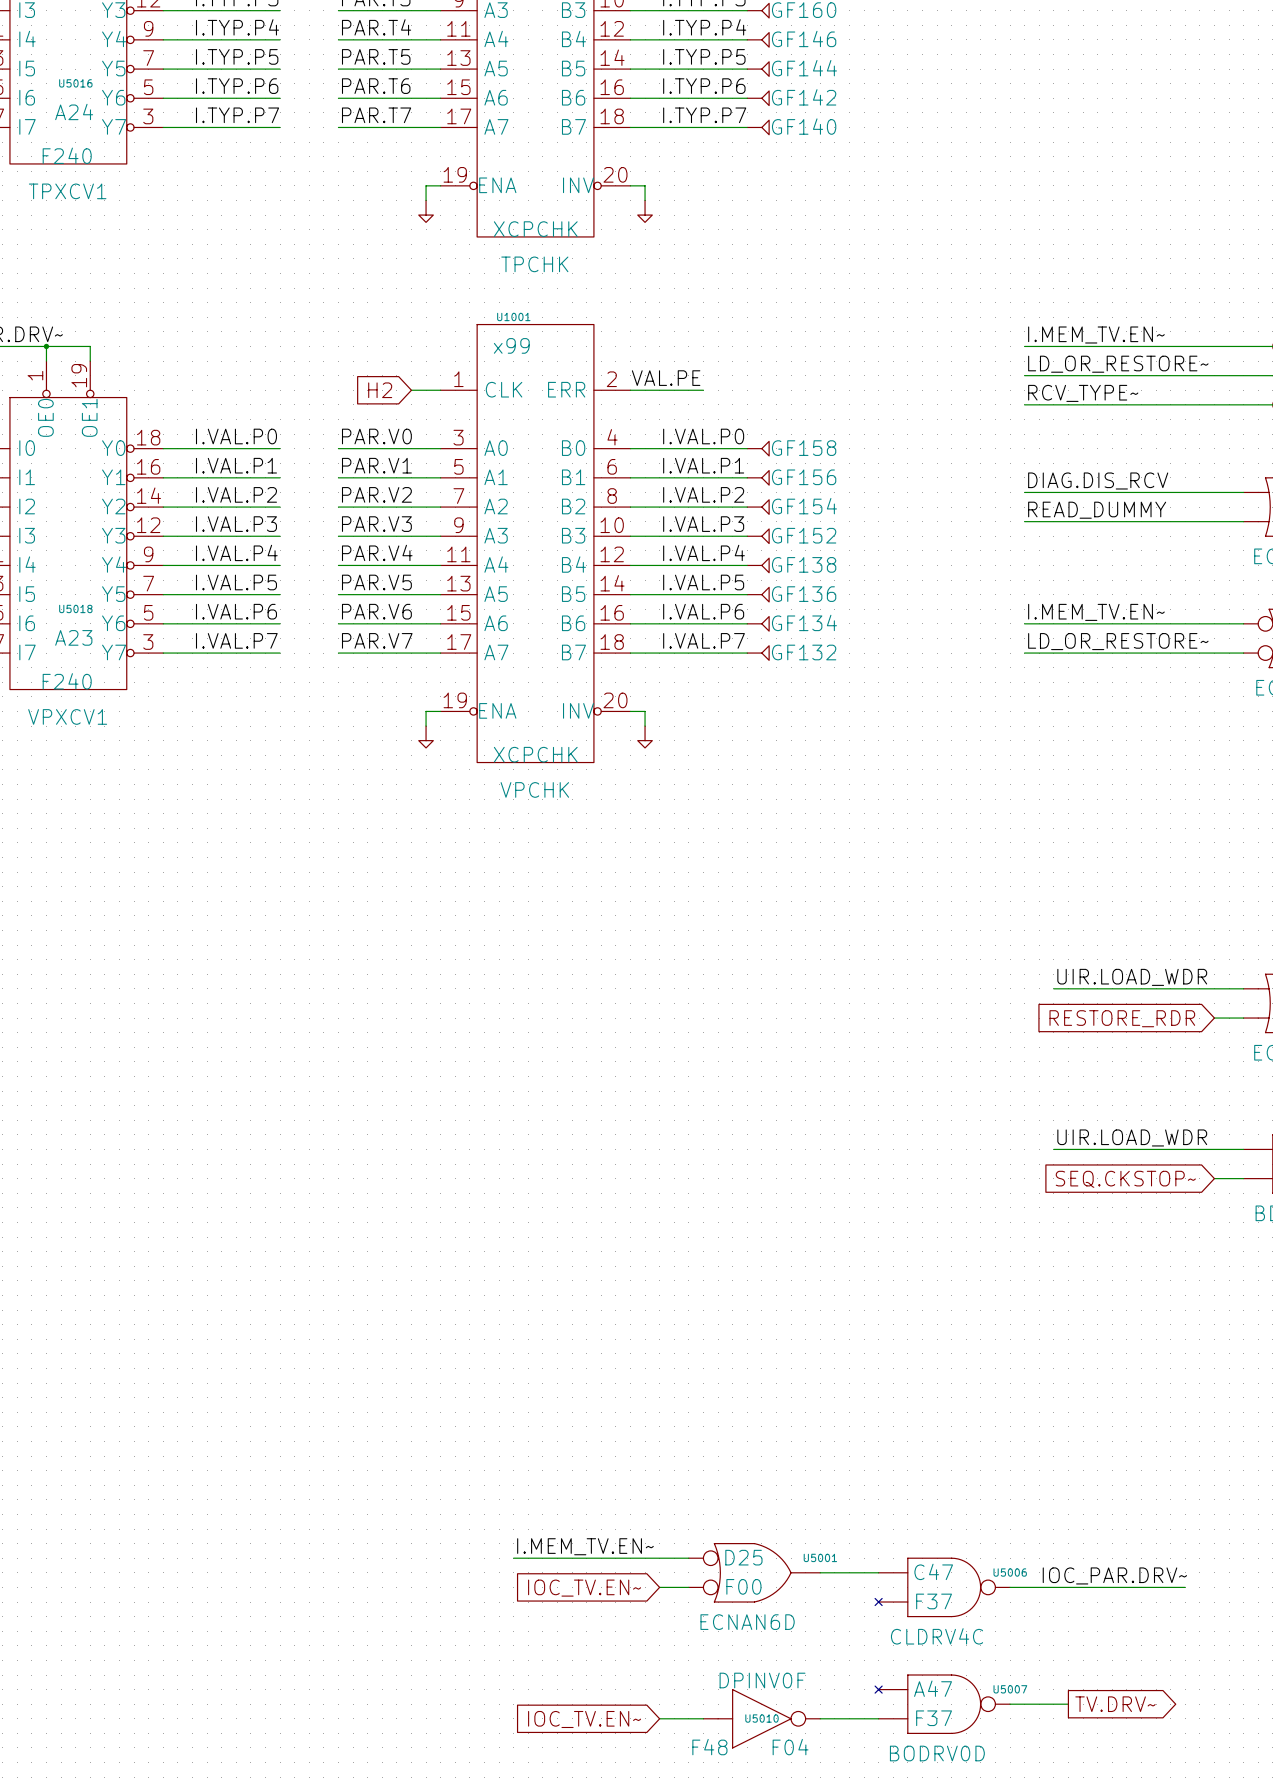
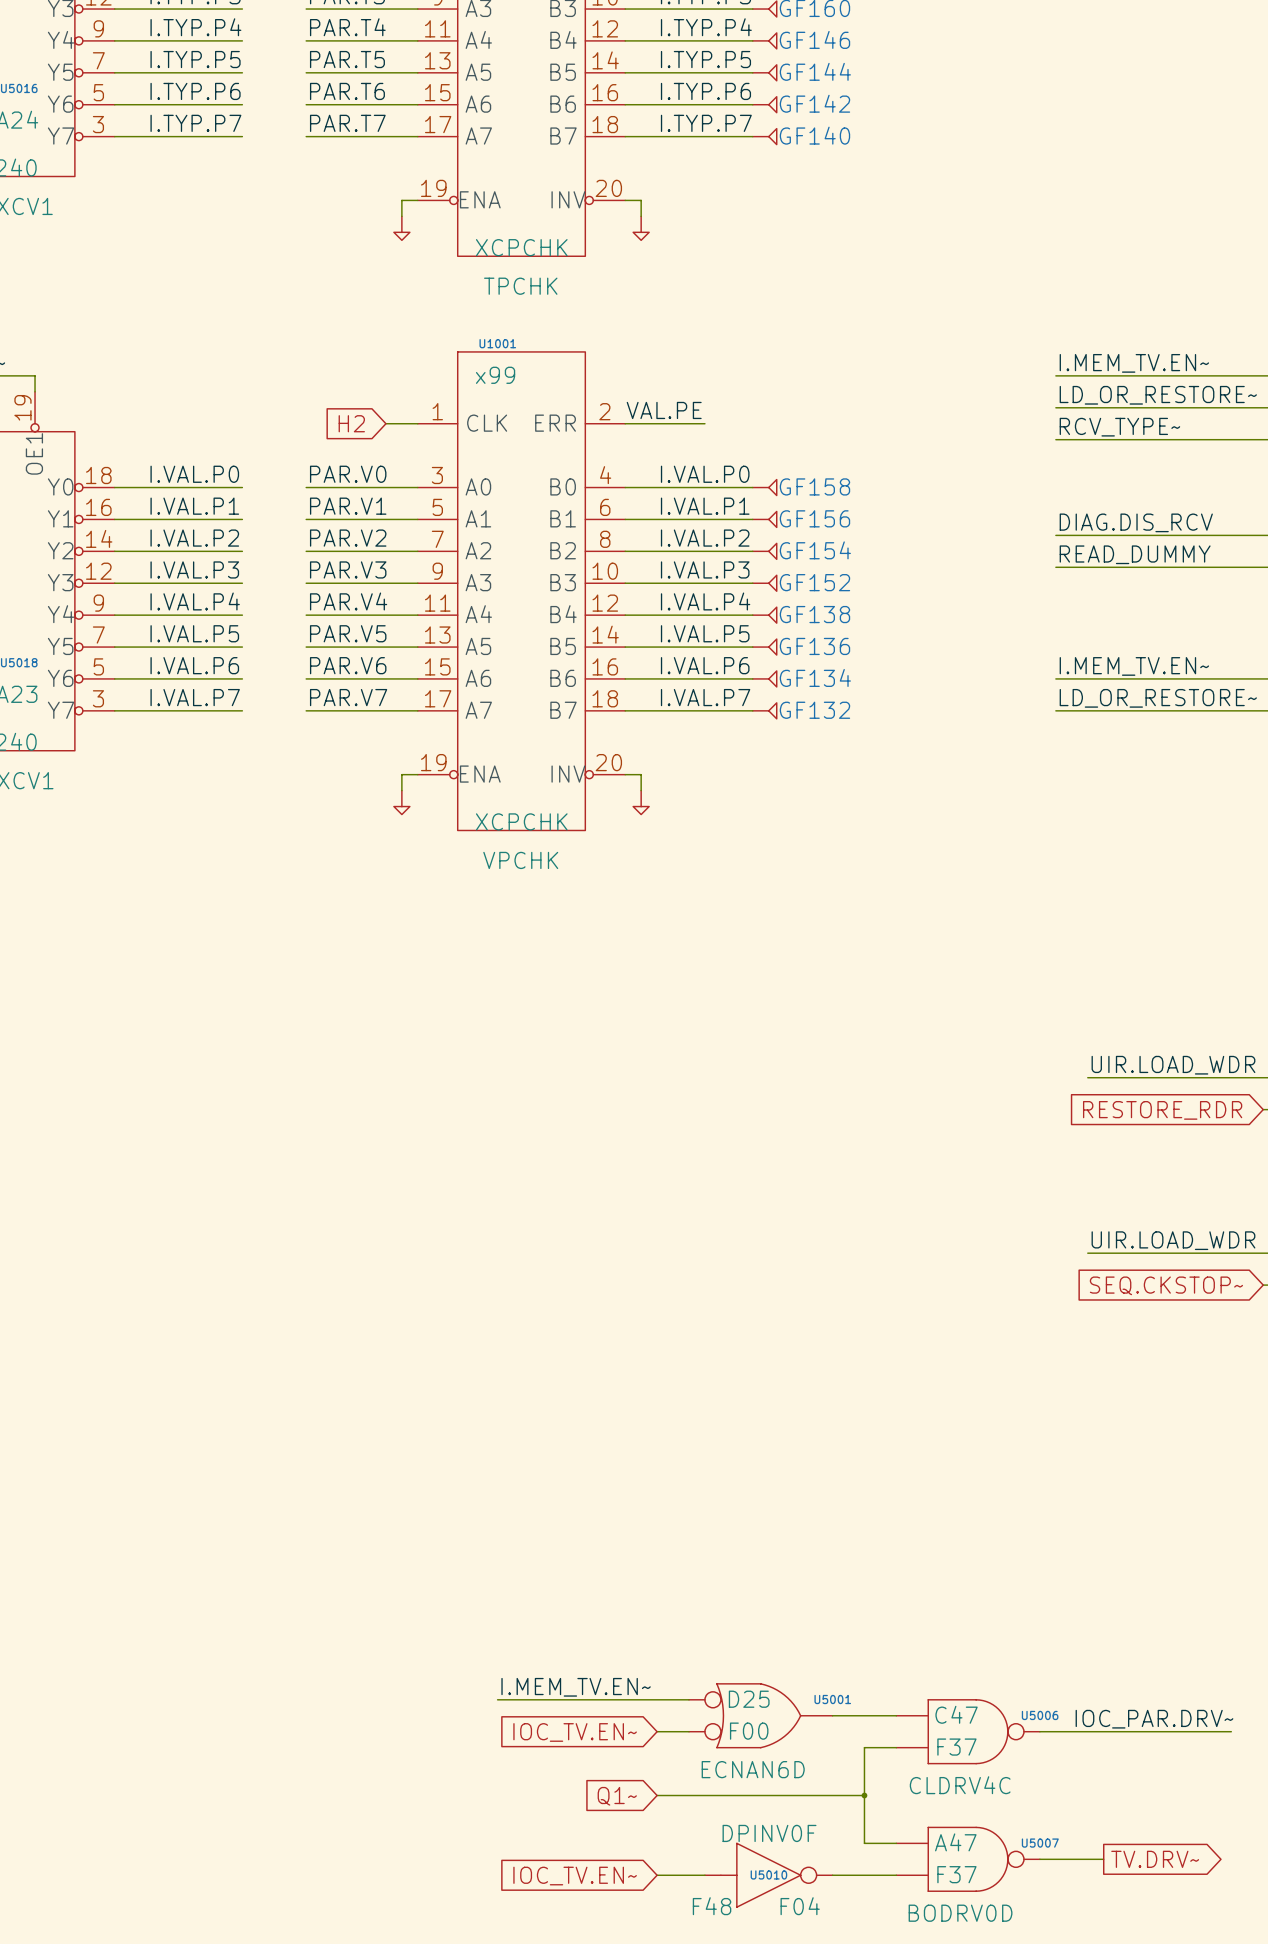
wire: none -> (896, 1747) (864, 1747) (864, 1843) (896, 1843)
no-connect mark: (878, 1602) -> none
wire: none -> (657, 1795) (864, 1795)
junction: none -> (864, 1795)
global label: none -> Q1~ (617, 1796)
no-connect mark: (878, 1689) -> none

